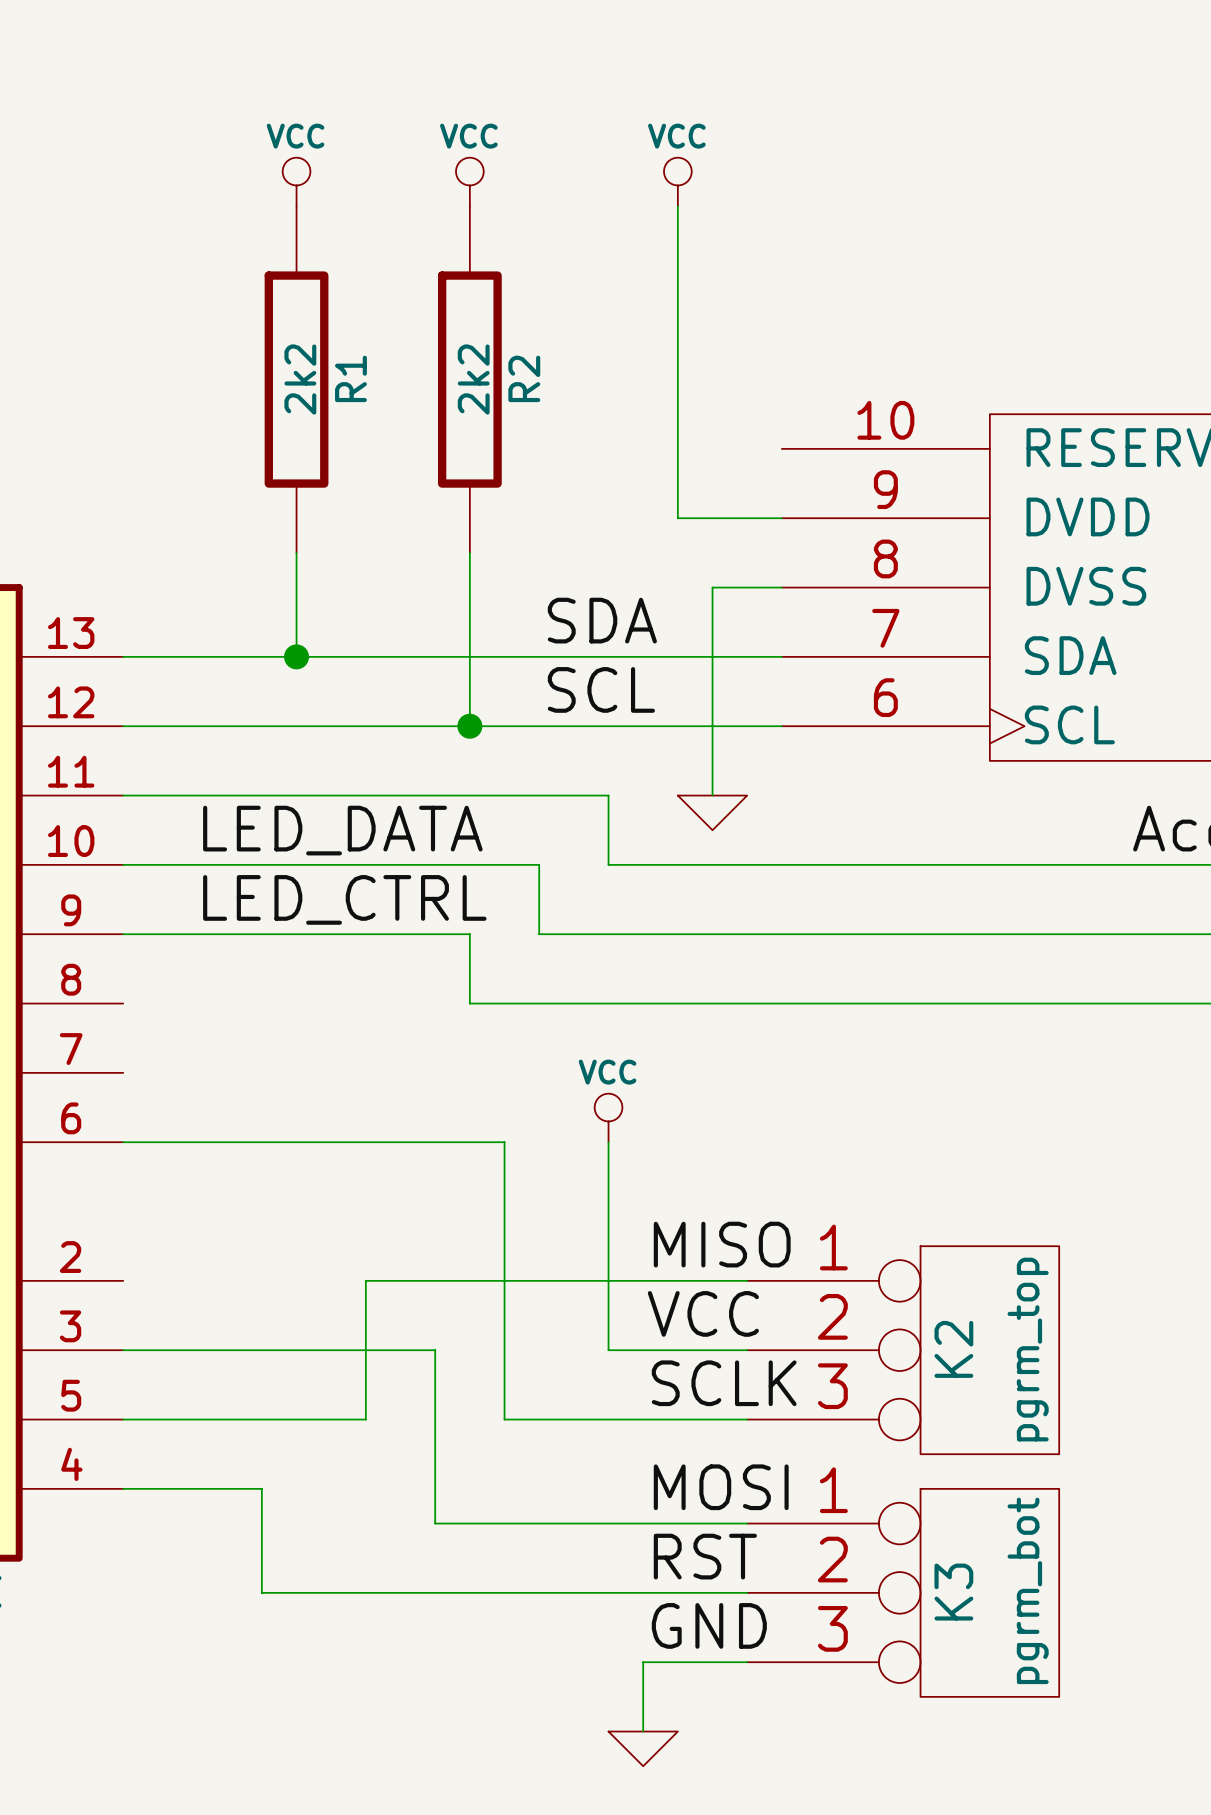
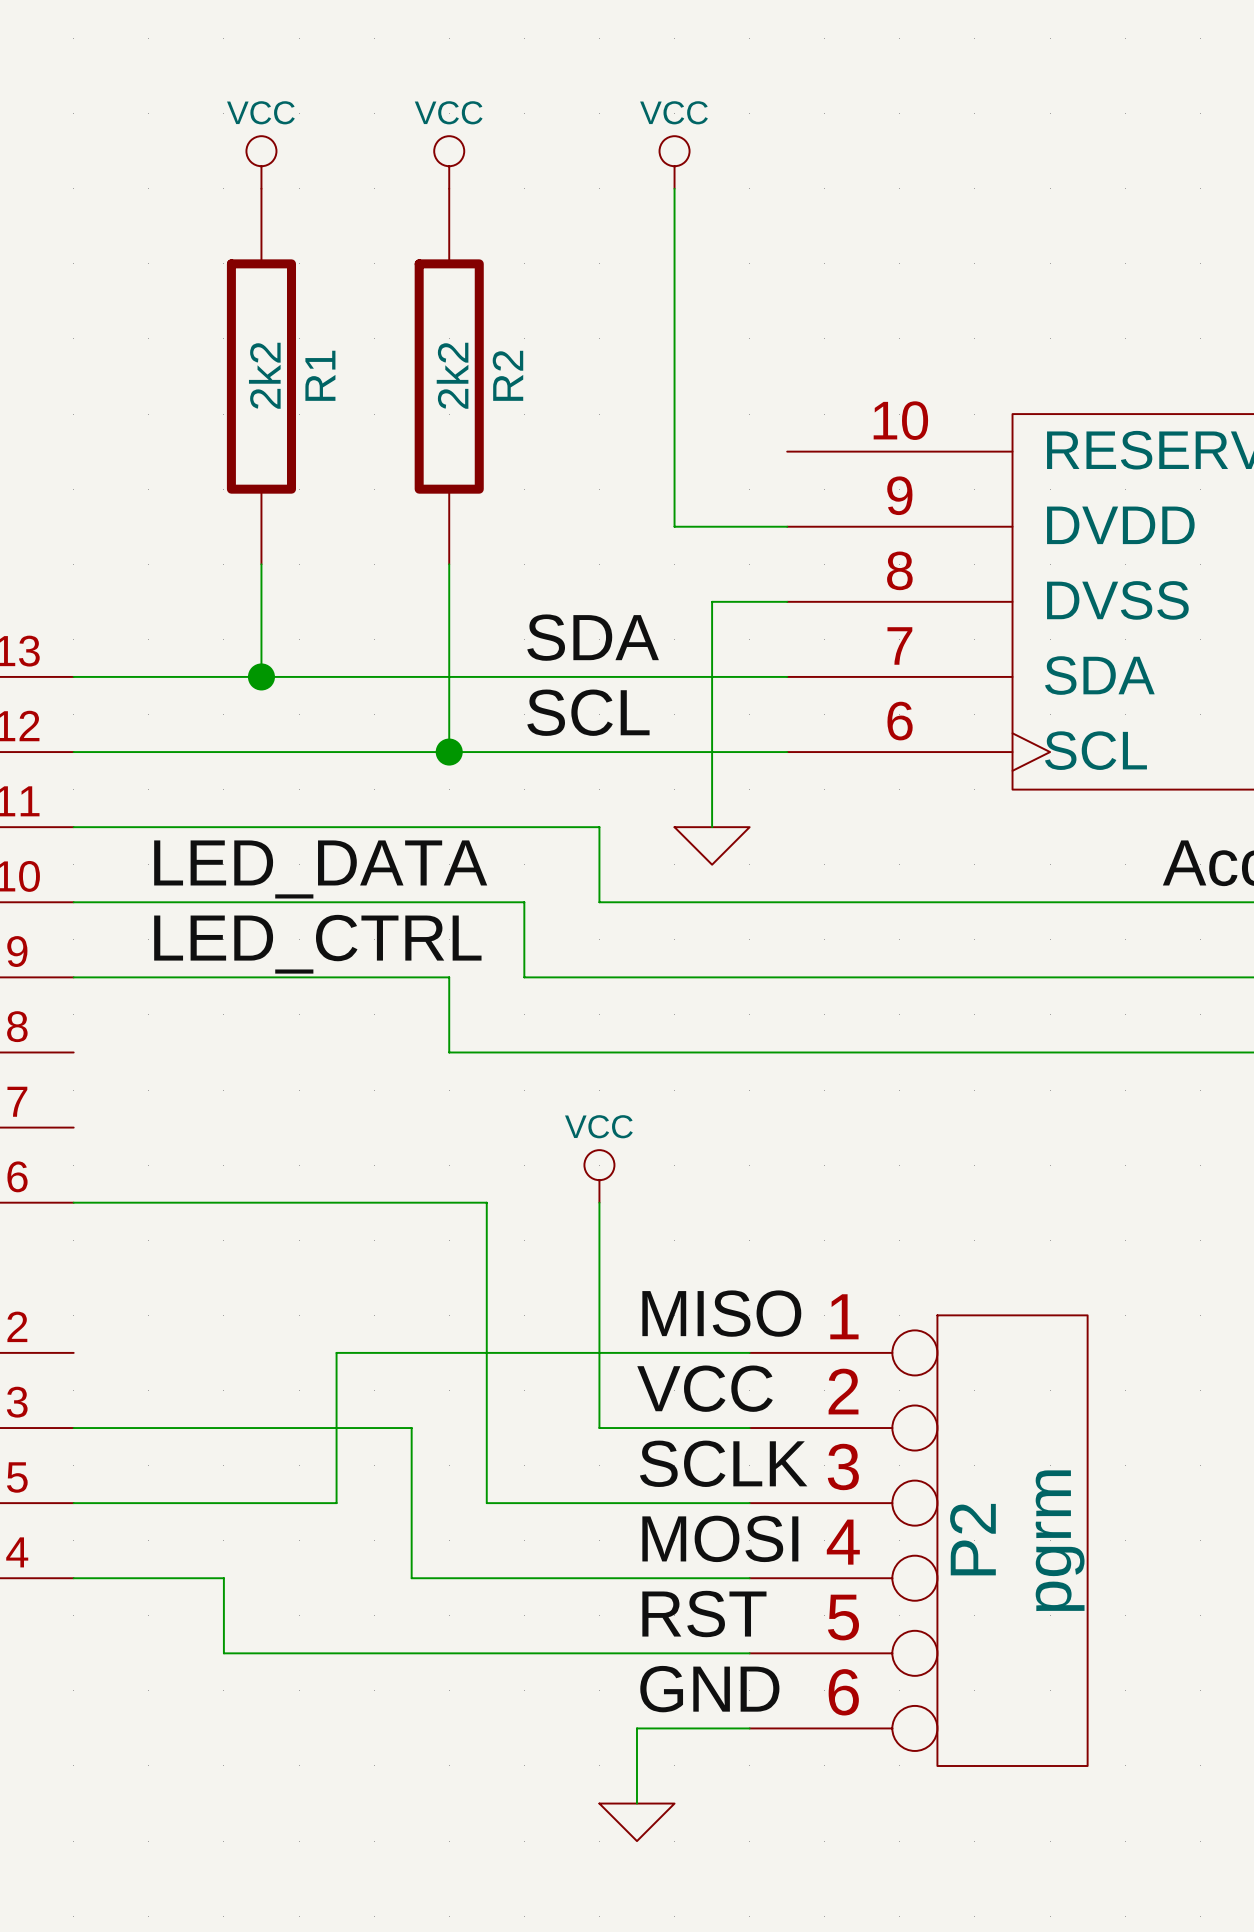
K2: pgrm_top (903, 1350) -> none
P2: none -> pgrm (918, 1540)
label position: MOSI (721, 1487) -> MOSI (720, 1538)
wire: (435, 1488) (435, 1523) (747, 1523) -> (411, 1578) (749, 1578)
label position: RST (705, 1556) -> RST (704, 1614)
wire: (261, 1558) (261, 1592) (747, 1592) -> (223, 1653) (749, 1653)
K3: pgrm_bot (903, 1592) -> none
label position: GND (709, 1625) -> GND (709, 1689)
wire: (643, 1662) (747, 1662) -> (636, 1765) (636, 1728) (749, 1728)
wire: (643, 1696) (643, 1731) -> none
power symbol position: (643, 1748) -> (636, 1822)

